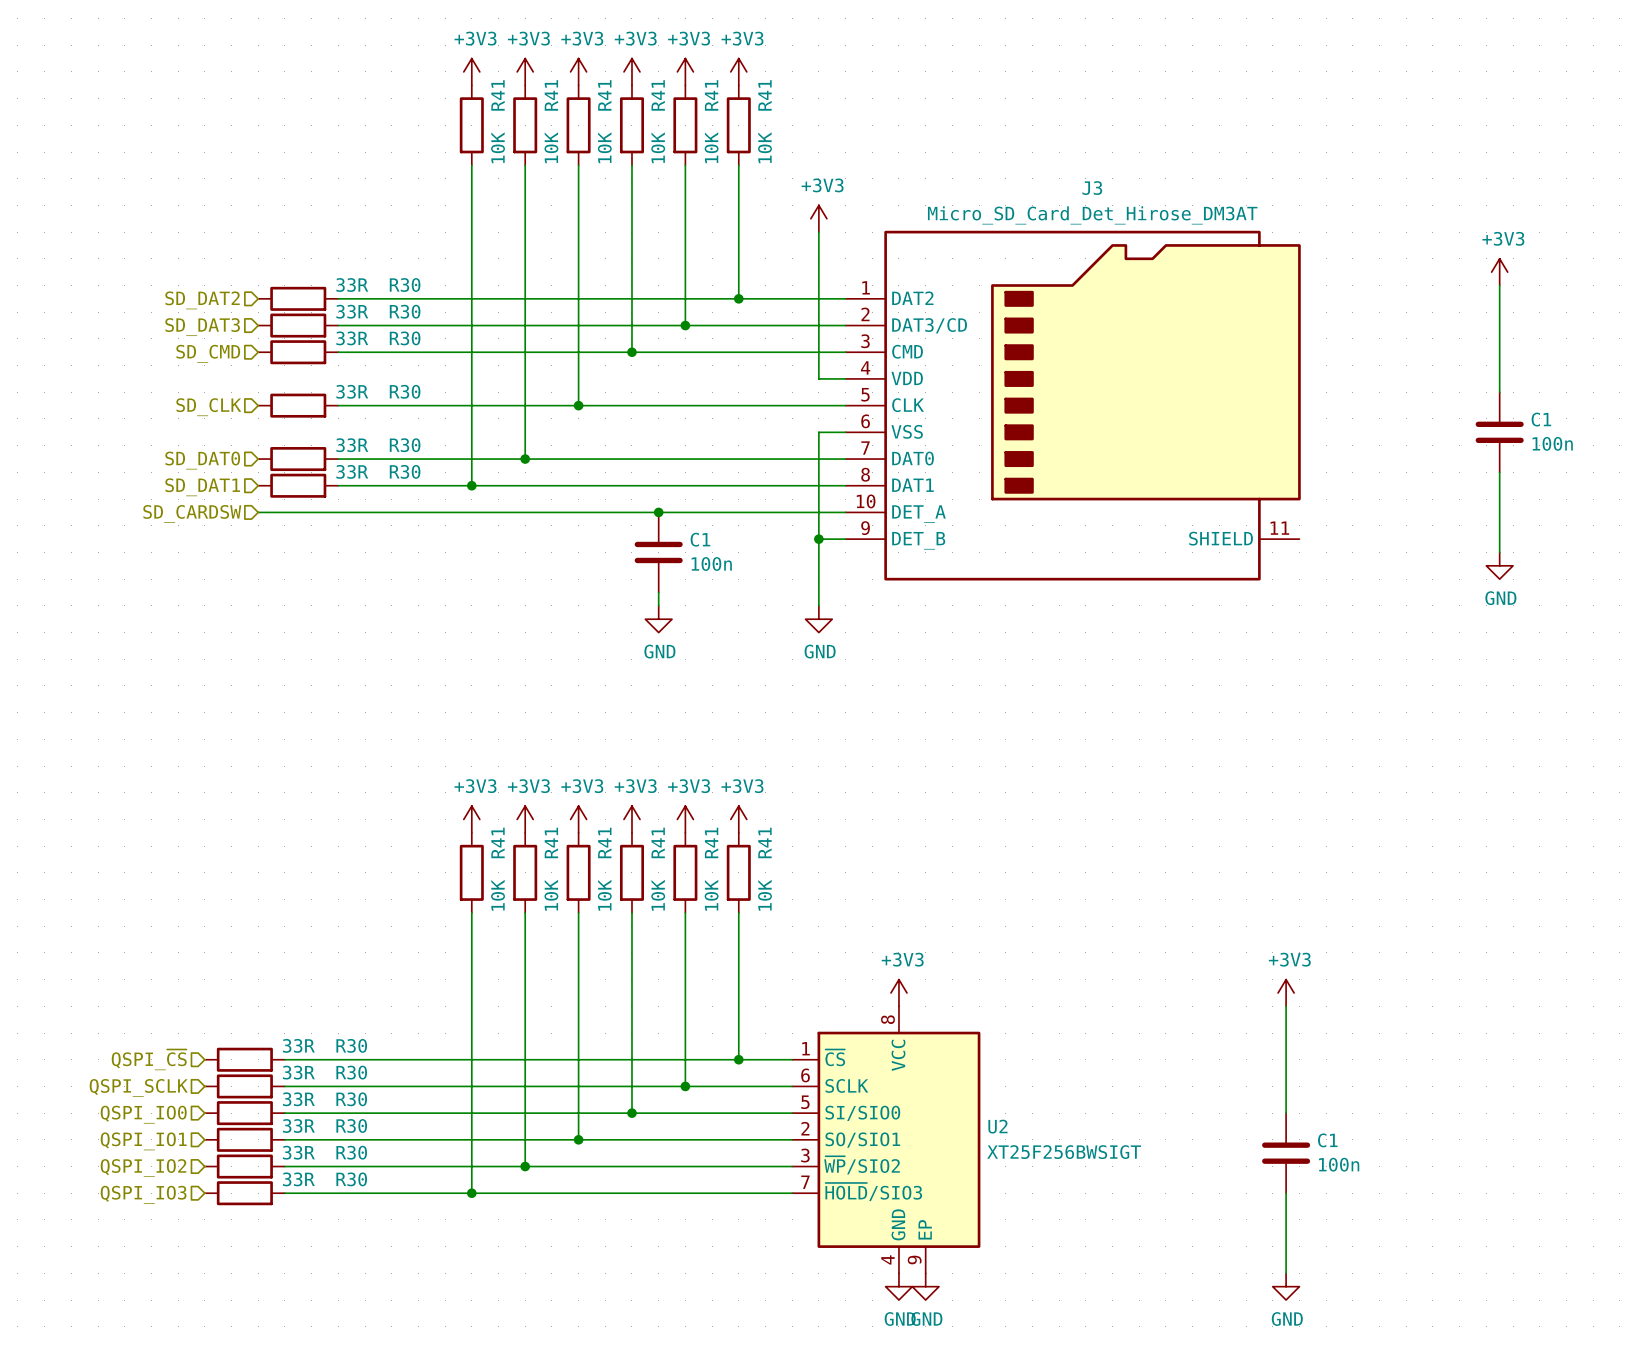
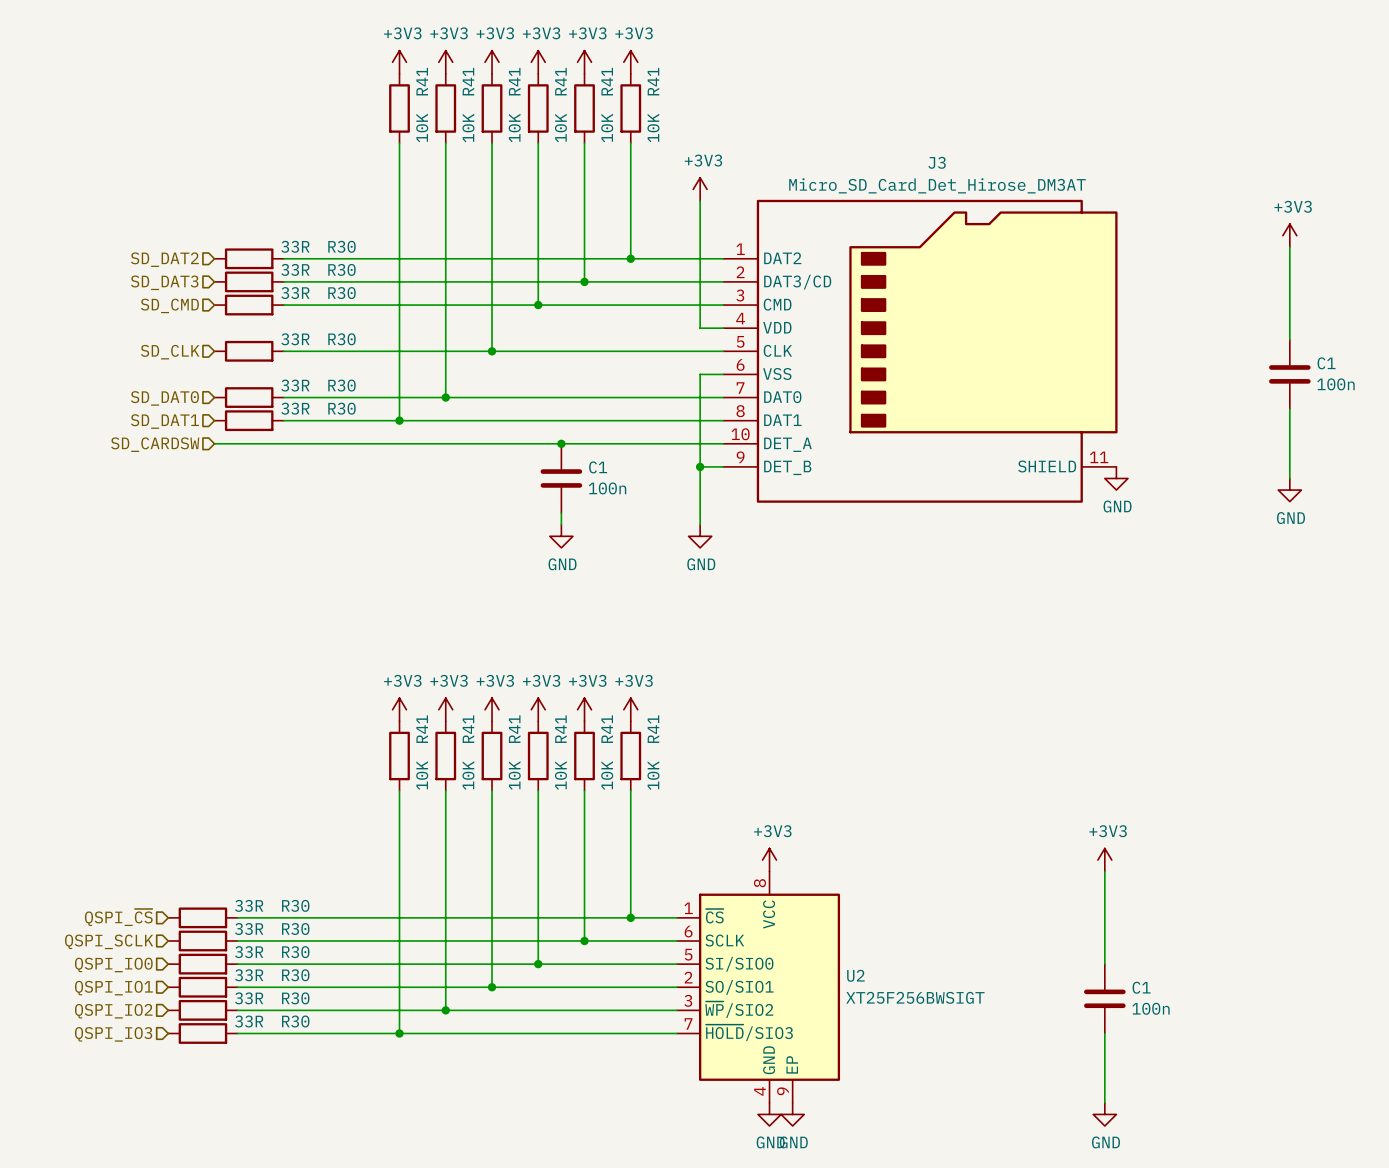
power symbol: none -> GND (1116, 478)

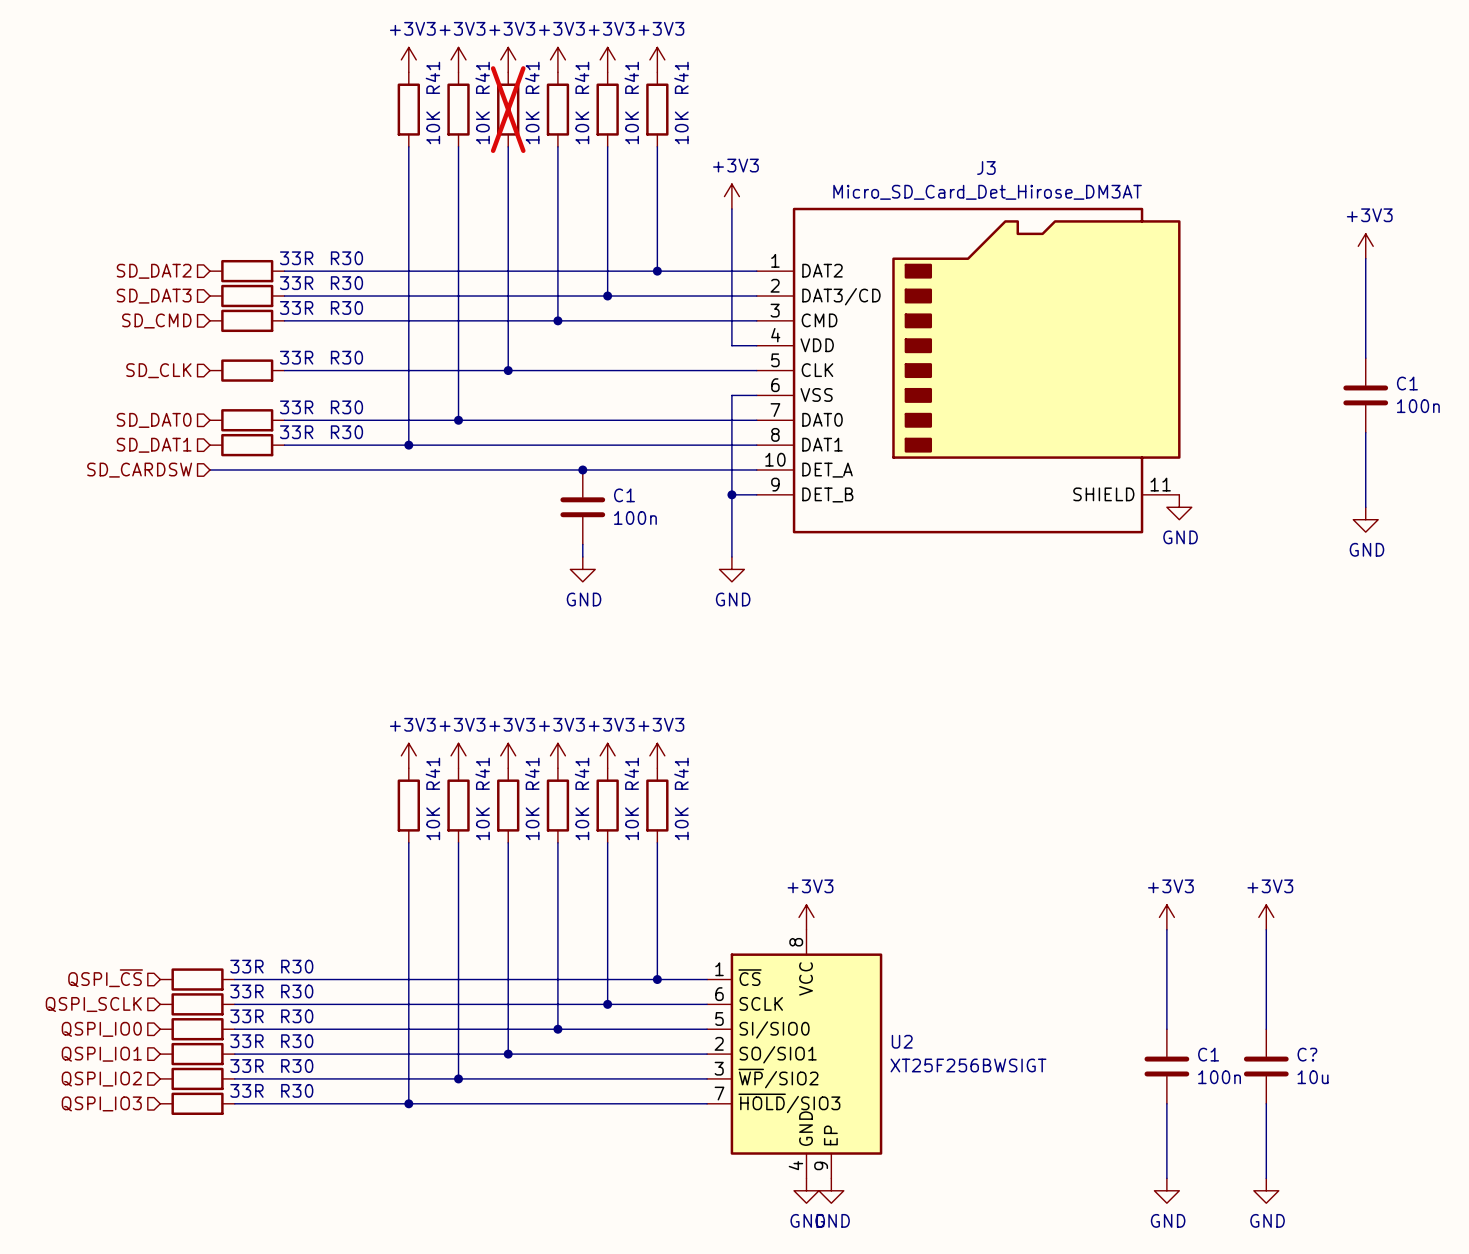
R41 do-not-place cross: none -> (508, 109)
power symbol: none -> +3V3 (1266, 917)
wire: none -> (1266, 929) (1266, 1029)
C?: none -> 10u (1266, 1066)
wire: none -> (1266, 1103) (1266, 1178)
power symbol: none -> GND (1266, 1190)

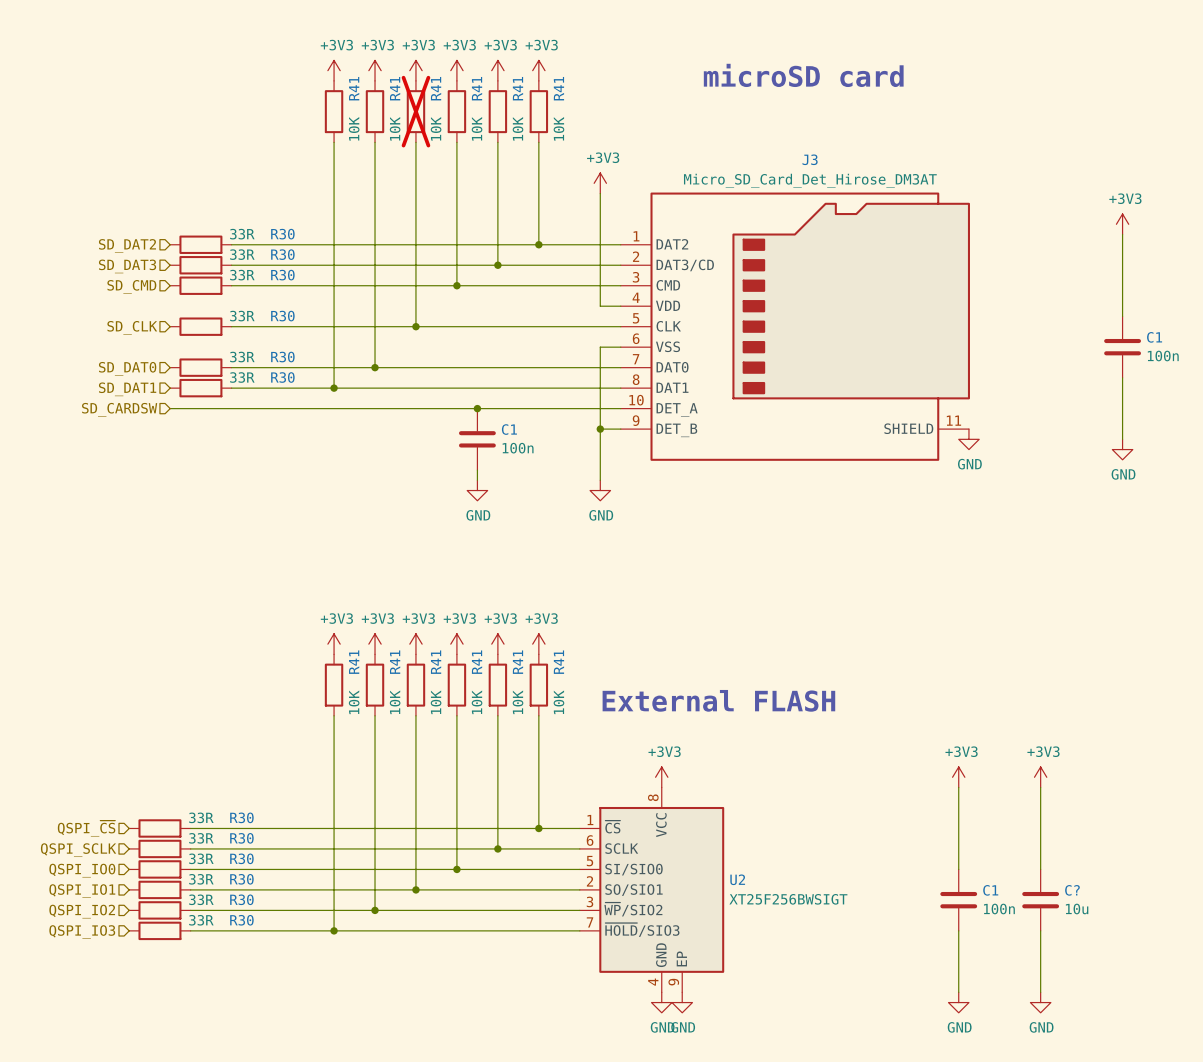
text: none -> microSD card (803, 75)
text: none -> External FLASH (718, 700)

